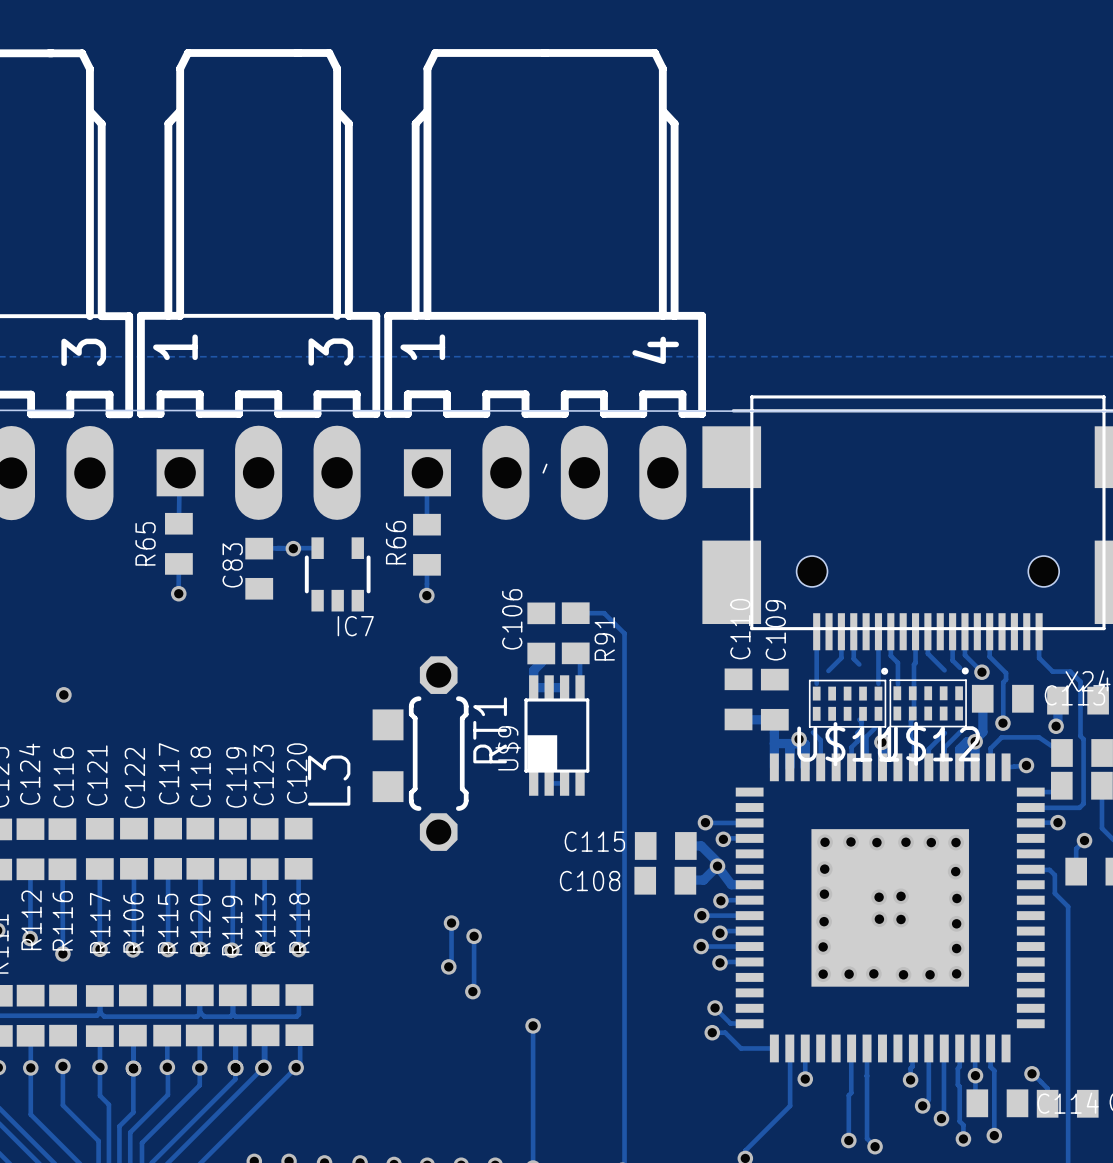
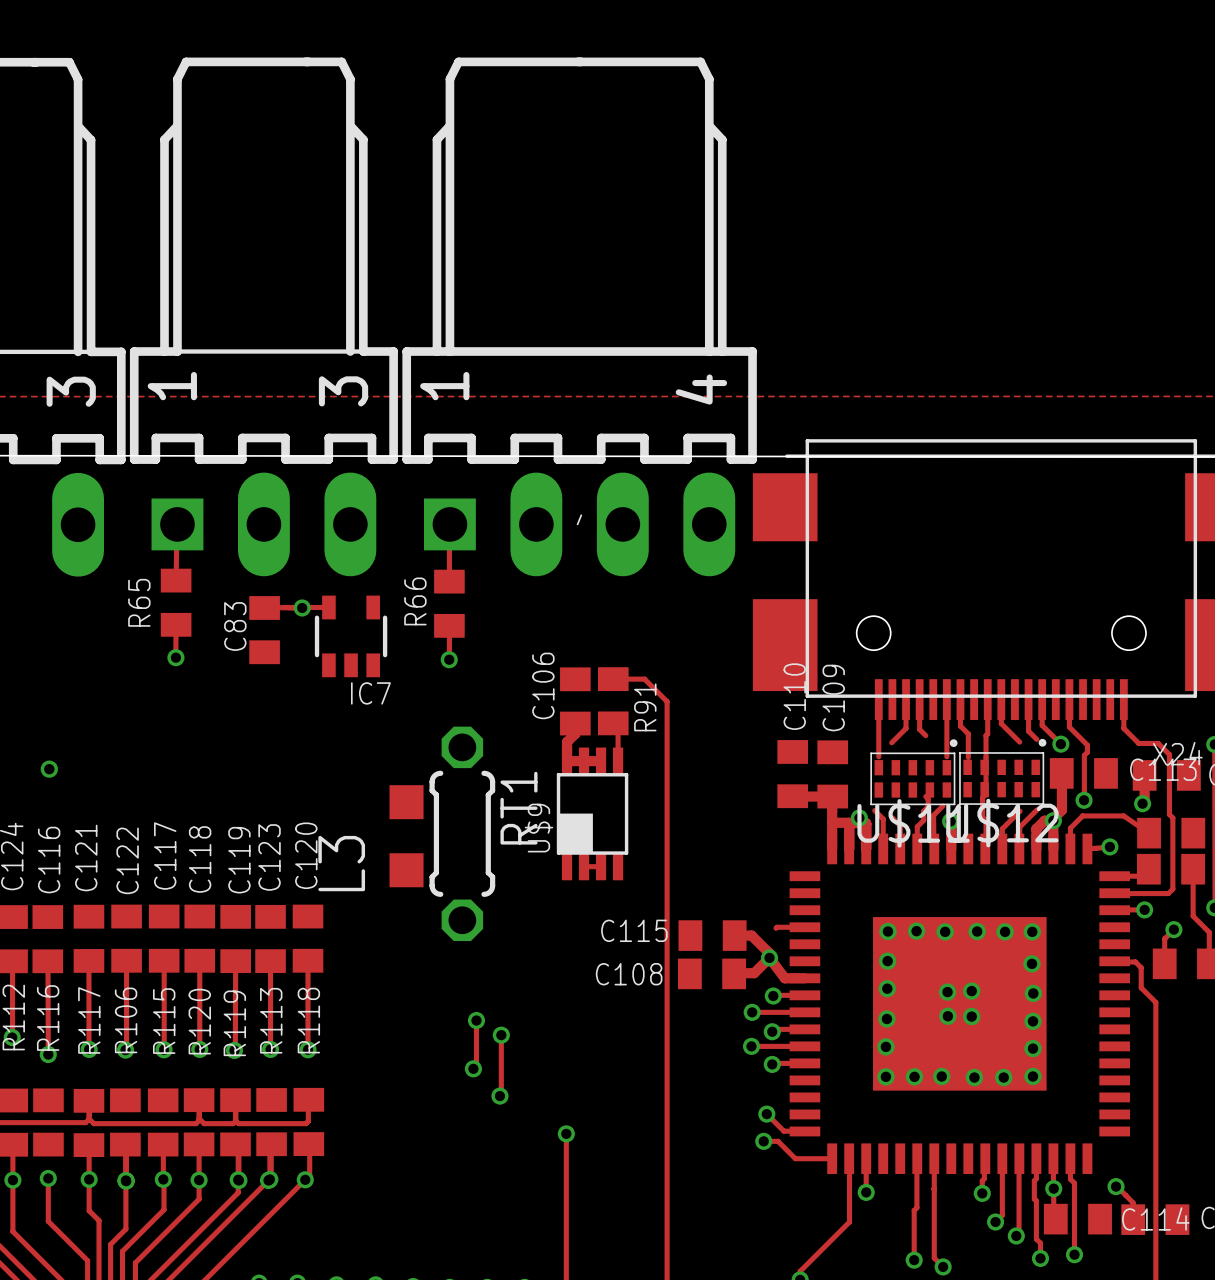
track: (705, 822) (749, 822) -> none
via: (705, 822) -> none
via: (723, 839) -> none

